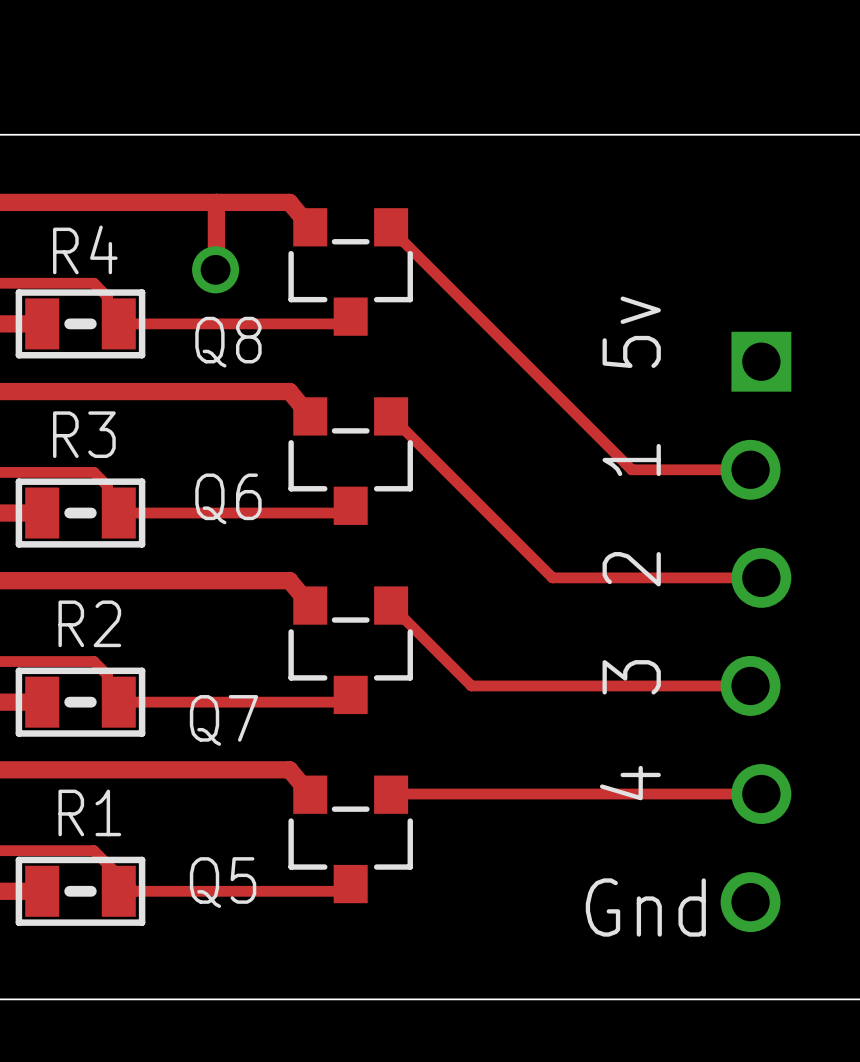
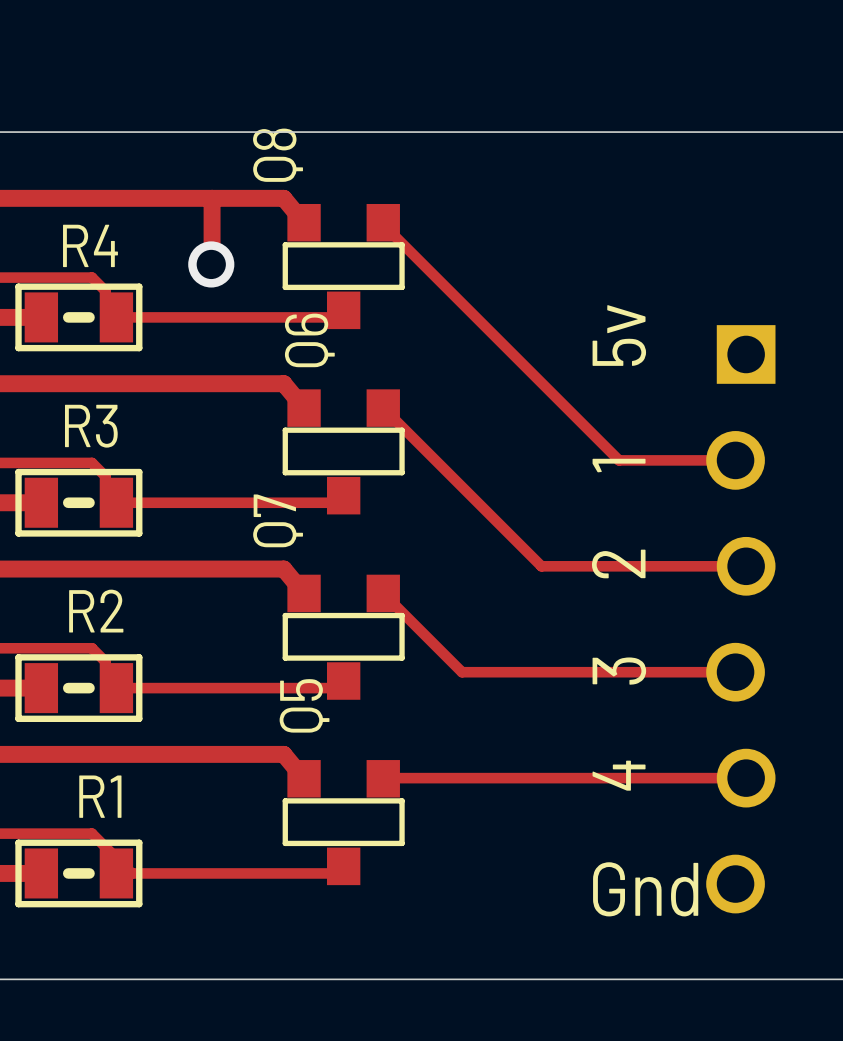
Q8 footprint: [288, 208, 413, 336] -> [282, 203, 405, 330]
Q8 name rotation: 0° (228, 342) -> 90° counterclockwise (278, 155)
Q8 name position: Q8 (228, 342) -> Q8 (278, 155)
Q6 footprint: [288, 397, 413, 525] -> [282, 389, 405, 515]
Q6 name rotation: 0° (228, 498) -> 90° counterclockwise (309, 340)
Q6 name position: Q6 (228, 498) -> Q6 (309, 340)
Q7 footprint: [288, 586, 413, 715] -> [282, 574, 405, 700]
Q7 name rotation: 0° (223, 720) -> 90° counterclockwise (278, 520)
Q7 name position: Q7 (223, 720) -> Q7 (278, 520)
Q5 footprint: [288, 775, 413, 904] -> [282, 760, 405, 886]
Q5 name rotation: 0° (223, 882) -> 90° counterclockwise (304, 705)
Q5 name position: Q5 (223, 882) -> Q5 (304, 705)

